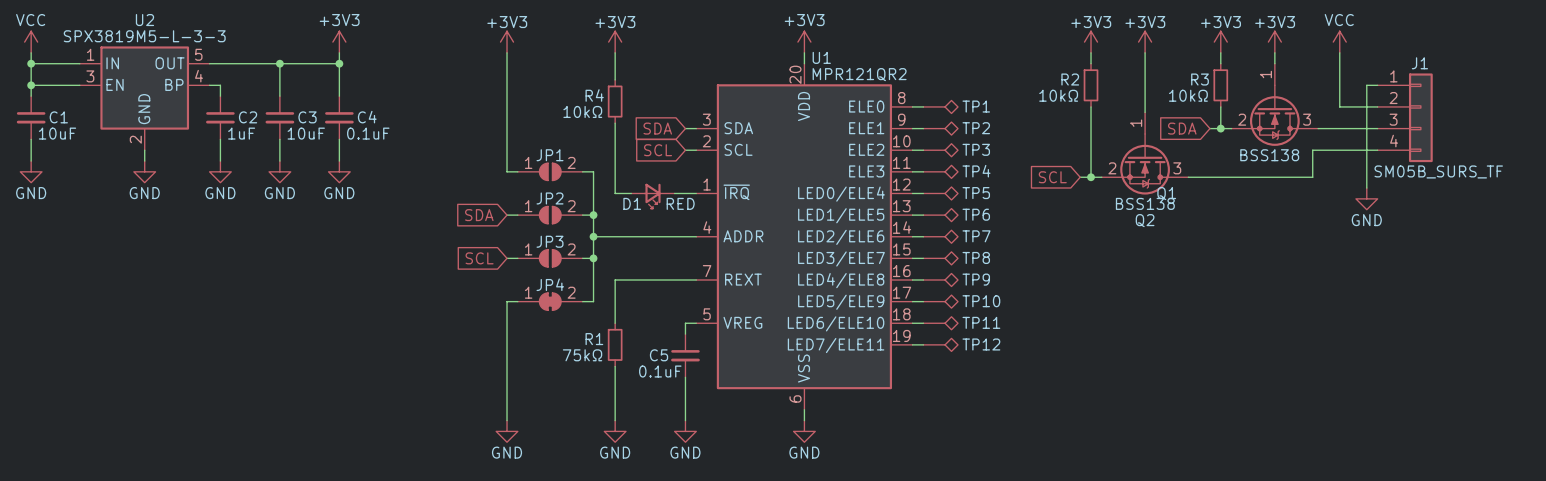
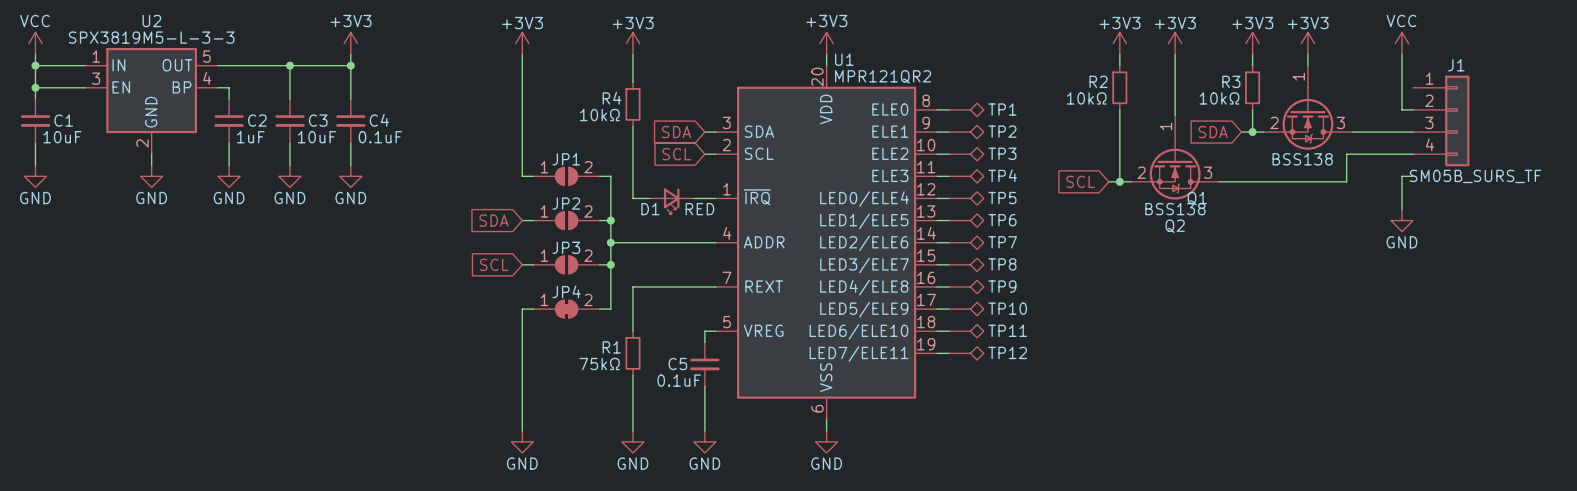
power symbol position: VCC (1339, 42) -> VCC (1401, 43)
wire: (1339, 52) (1339, 106) (1366, 106) (1366, 171) -> (1413, 176) (1401, 176)
wire: (1366, 85) (1377, 85) -> (1401, 87) (1401, 54)
power symbol position: GND (1366, 198) -> GND (1401, 220)

